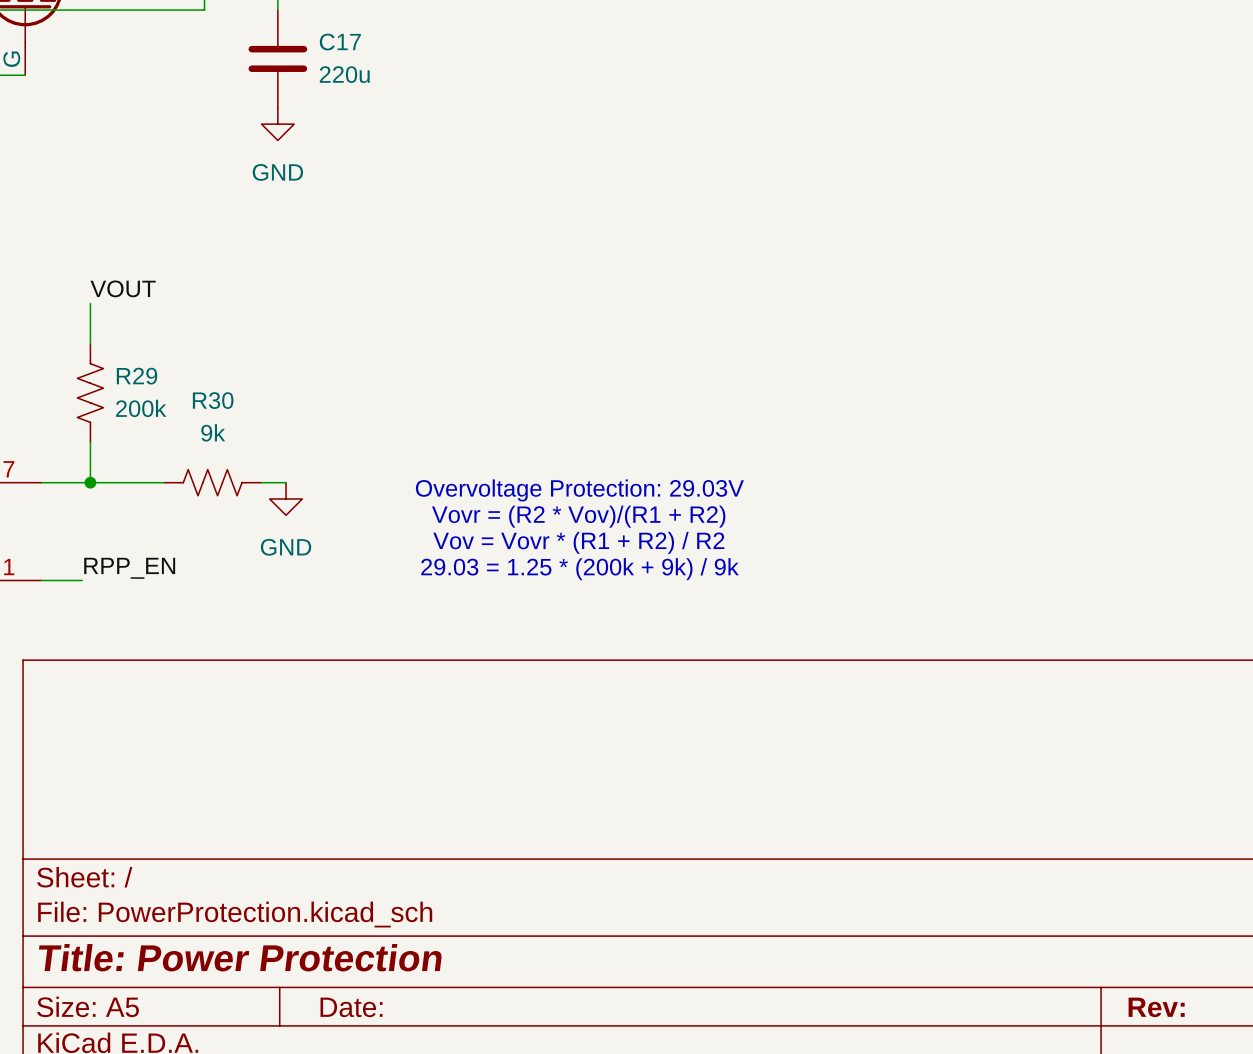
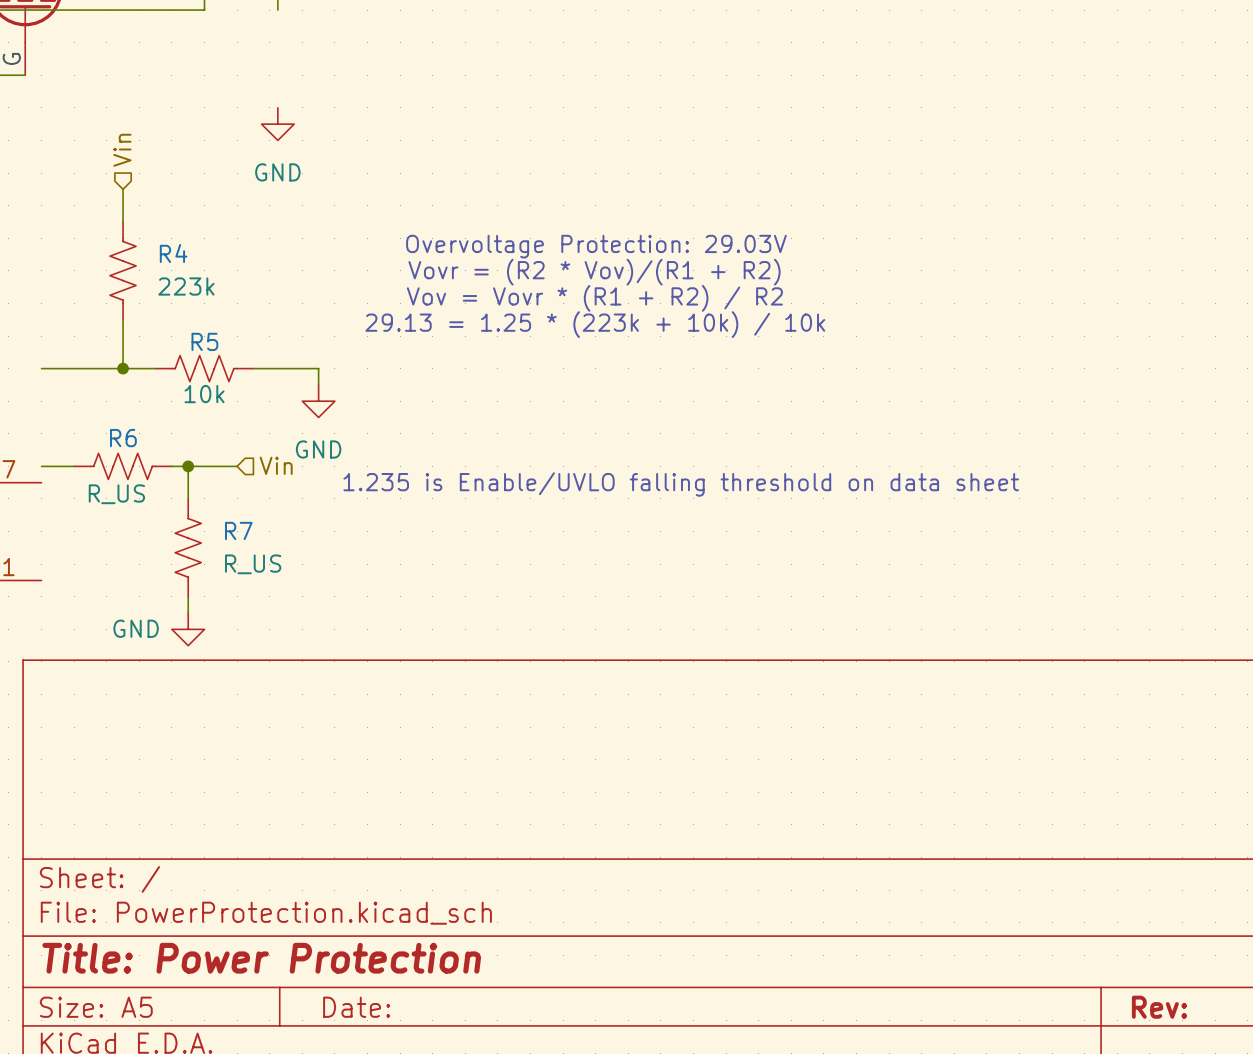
C17: 220u (277, 58) -> none
hierarchical label: none -> Vin (122, 150)
wire: none -> (123, 189) (123, 221)
R4: none -> 223k (123, 270)
label: VOUT (123, 288) -> none
wire: (90, 303) (90, 344) -> none
wire: none -> (123, 319) (123, 368)
text: none -> 29.13 = 1.25 * (223k + 10k) / 10k (595, 324)
wire: none -> (41, 368) (155, 368)
junction: none -> (123, 368)
R5: none -> 10k (204, 368)
wire: none -> (253, 368) (318, 368) (318, 384)
R29: 200k (90, 393) -> none
power symbol: none -> GND (318, 401)
wire: (90, 441) (90, 482) -> none
hierarchical label: none -> Vin (276, 465)
wire: none -> (41, 466) (74, 466)
R6: none -> R_US (123, 466)
wire: none -> (171, 466) (237, 466)
wire: none -> (188, 466) (188, 498)
junction: none -> (188, 466)
wire: (41, 482) (163, 482) -> none
junction: (90, 482) -> none
R30: 9k (212, 482) -> none
wire: (261, 482) (286, 482) -> none
text: none -> 1.235 is Enable/UVLO falling threshold on data sheet (681, 484)
text position: Overvoltage Protection: 29.03V (579, 490) -> Overvoltage Protection: 29.03V (596, 246)
power symbol: GND (286, 498) -> none
text position: Vovr = (R2 * Vov)/(R1 + R2) (578, 516) -> Vovr = (R2 * Vov)/(R1 + R2) (594, 272)
text position: Vov = Vovr * (R1 + R2) / R2 (578, 542) -> Vov = Vovr * (R1 + R2) / R2 (594, 298)
R7: none -> R_US (188, 547)
label: RPP_EN (129, 568) -> none
text: 29.03 = 1.25 * (200k + 9k) / 9k (579, 569) -> none
wire: (41, 580) (82, 580) -> none
wire: none -> (188, 596) (188, 613)
power symbol: none -> GND (188, 629)

